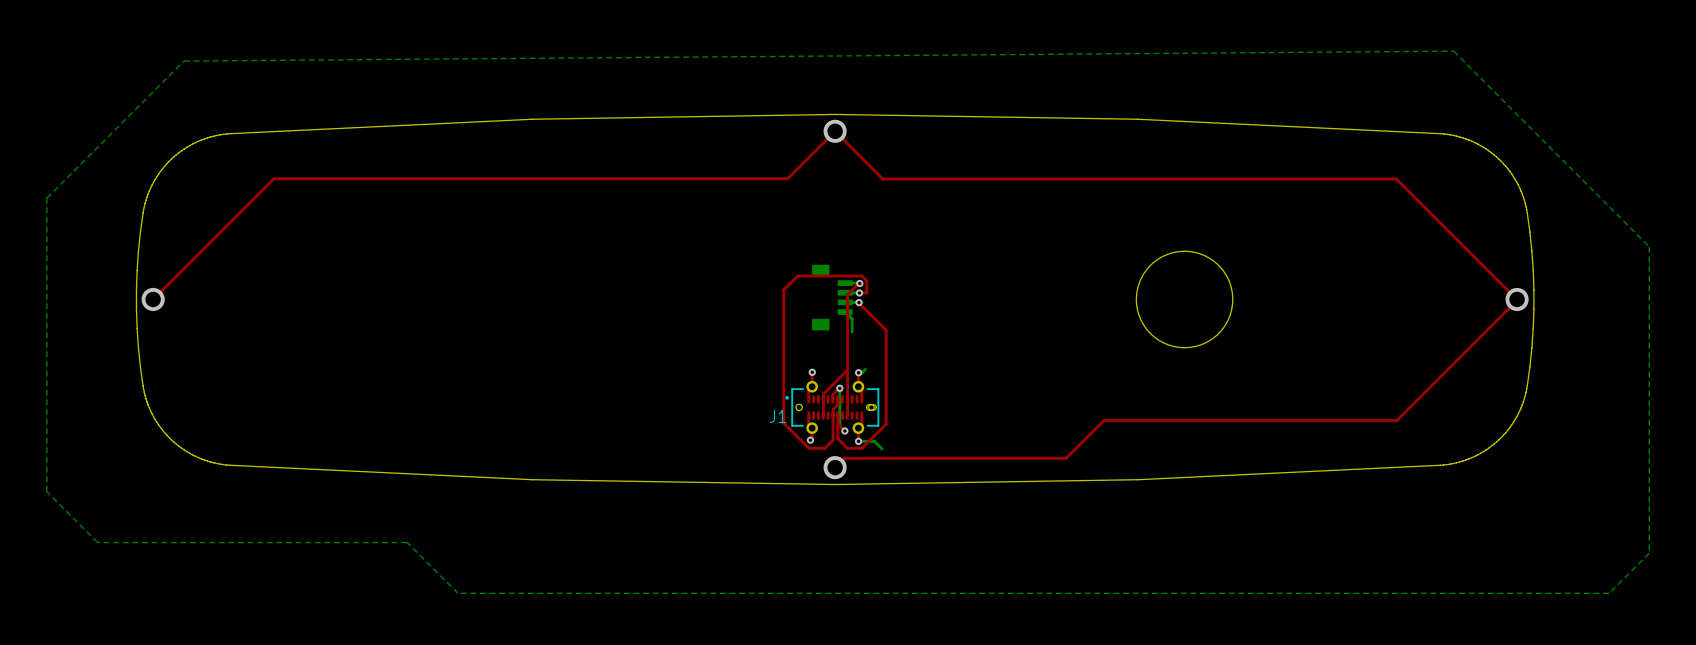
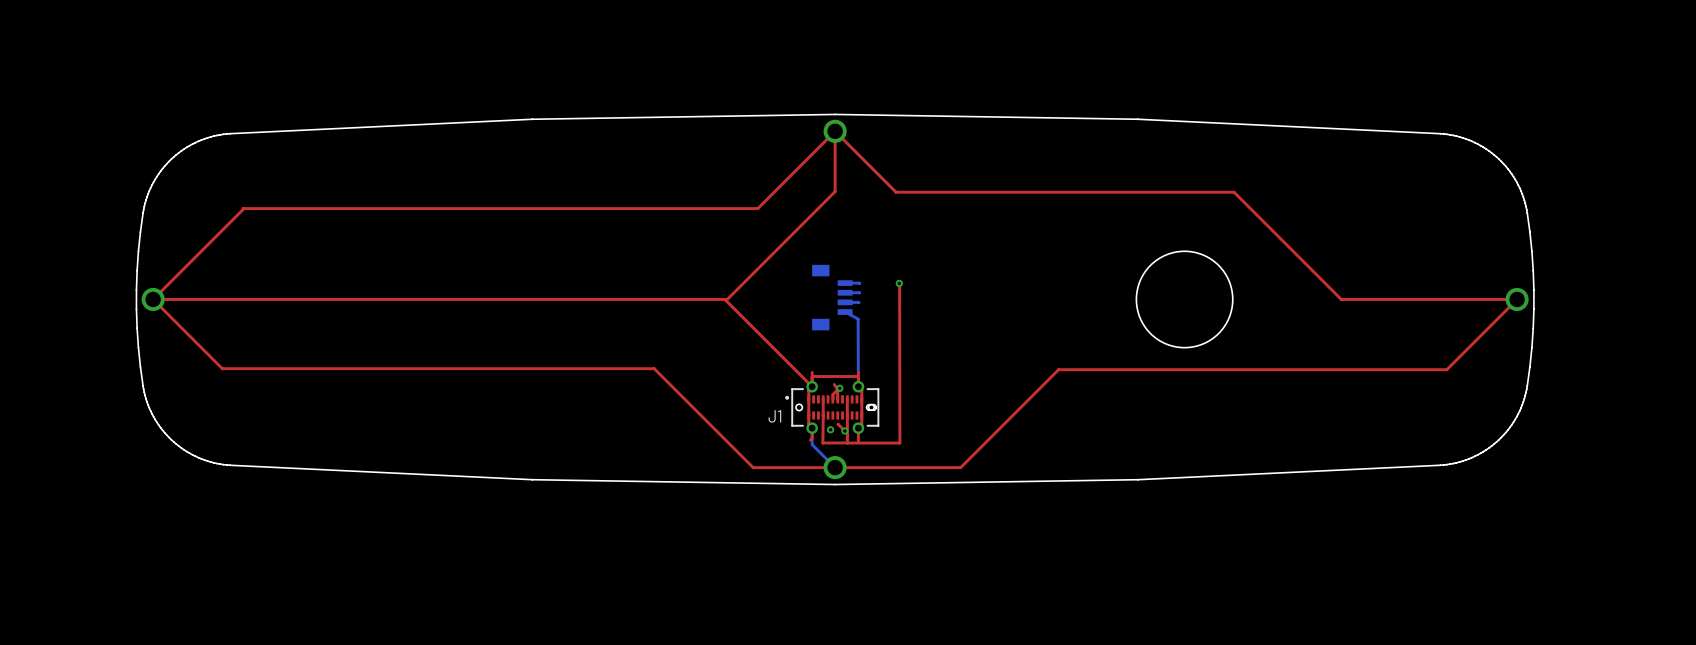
bottom zone outline: (1453, 51) (1649, 246) (1649, 553) (1609, 593) (458, 593) (407, 542) (97, 542) (46, 491) (46, 198) (183, 61) (1453, 51) -> none
top track: none -> (835, 131) (835, 191) (726, 300)
top track: (787, 178) (273, 178) (243, 209) -> (787, 178) (757, 208) (243, 209)
top track: (882, 179) (1396, 179) (1516, 299) -> (882, 179) (896, 192) (1234, 192) (1341, 299) (1516, 299)
top track: (859, 283) (847, 294) (847, 415) -> none
via: (859, 283) -> none
top track: none -> (899, 283) (899, 443) (847, 443) (847, 399)
via: none -> (899, 283)
top track: (859, 292) (866, 292) (866, 280) (862, 276) (797, 276) (783, 290) (783, 423) (809, 448) (824, 448) (833, 440) (833, 409) (837, 404) (837, 399) -> (834, 384) (837, 389) (837, 399)
via: (859, 292) -> none
top track: (1517, 299) (1396, 420) (1103, 420) (1066, 458) (844, 458) (835, 467) -> (1517, 299) (1446, 369) (1058, 369) (960, 467) (753, 467) (654, 368) (222, 368) (153, 299) (724, 299) (812, 386) (812, 376) (858, 376) (858, 386)
top track: (859, 302) (886, 330) (886, 424) (862, 448) (847, 448) (837, 438) (837, 415) -> none
via: (859, 302) -> none
bottom track: (845, 312) (852, 319) (852, 332) -> (845, 312) (858, 319) (858, 386)
bottom track: (865, 369) (862, 372) (858, 372) -> none
top track: (847, 371) (823, 394) (823, 415) -> none
via: (812, 372) -> none
via: (858, 372) -> none
bottom track: (839, 388) (839, 426) (844, 431) -> none
top track: none -> (808, 399) (808, 415)
top track: none -> (823, 399) (822, 443) (847, 442)
top track: none -> (861, 399) (861, 415)
bottom track: none -> (812, 428) (812, 444) (835, 467)
via: none -> (830, 429)
via: (810, 440) -> none
bottom track: (858, 441) (874, 441) (882, 448) -> none
via: (858, 441) -> none

